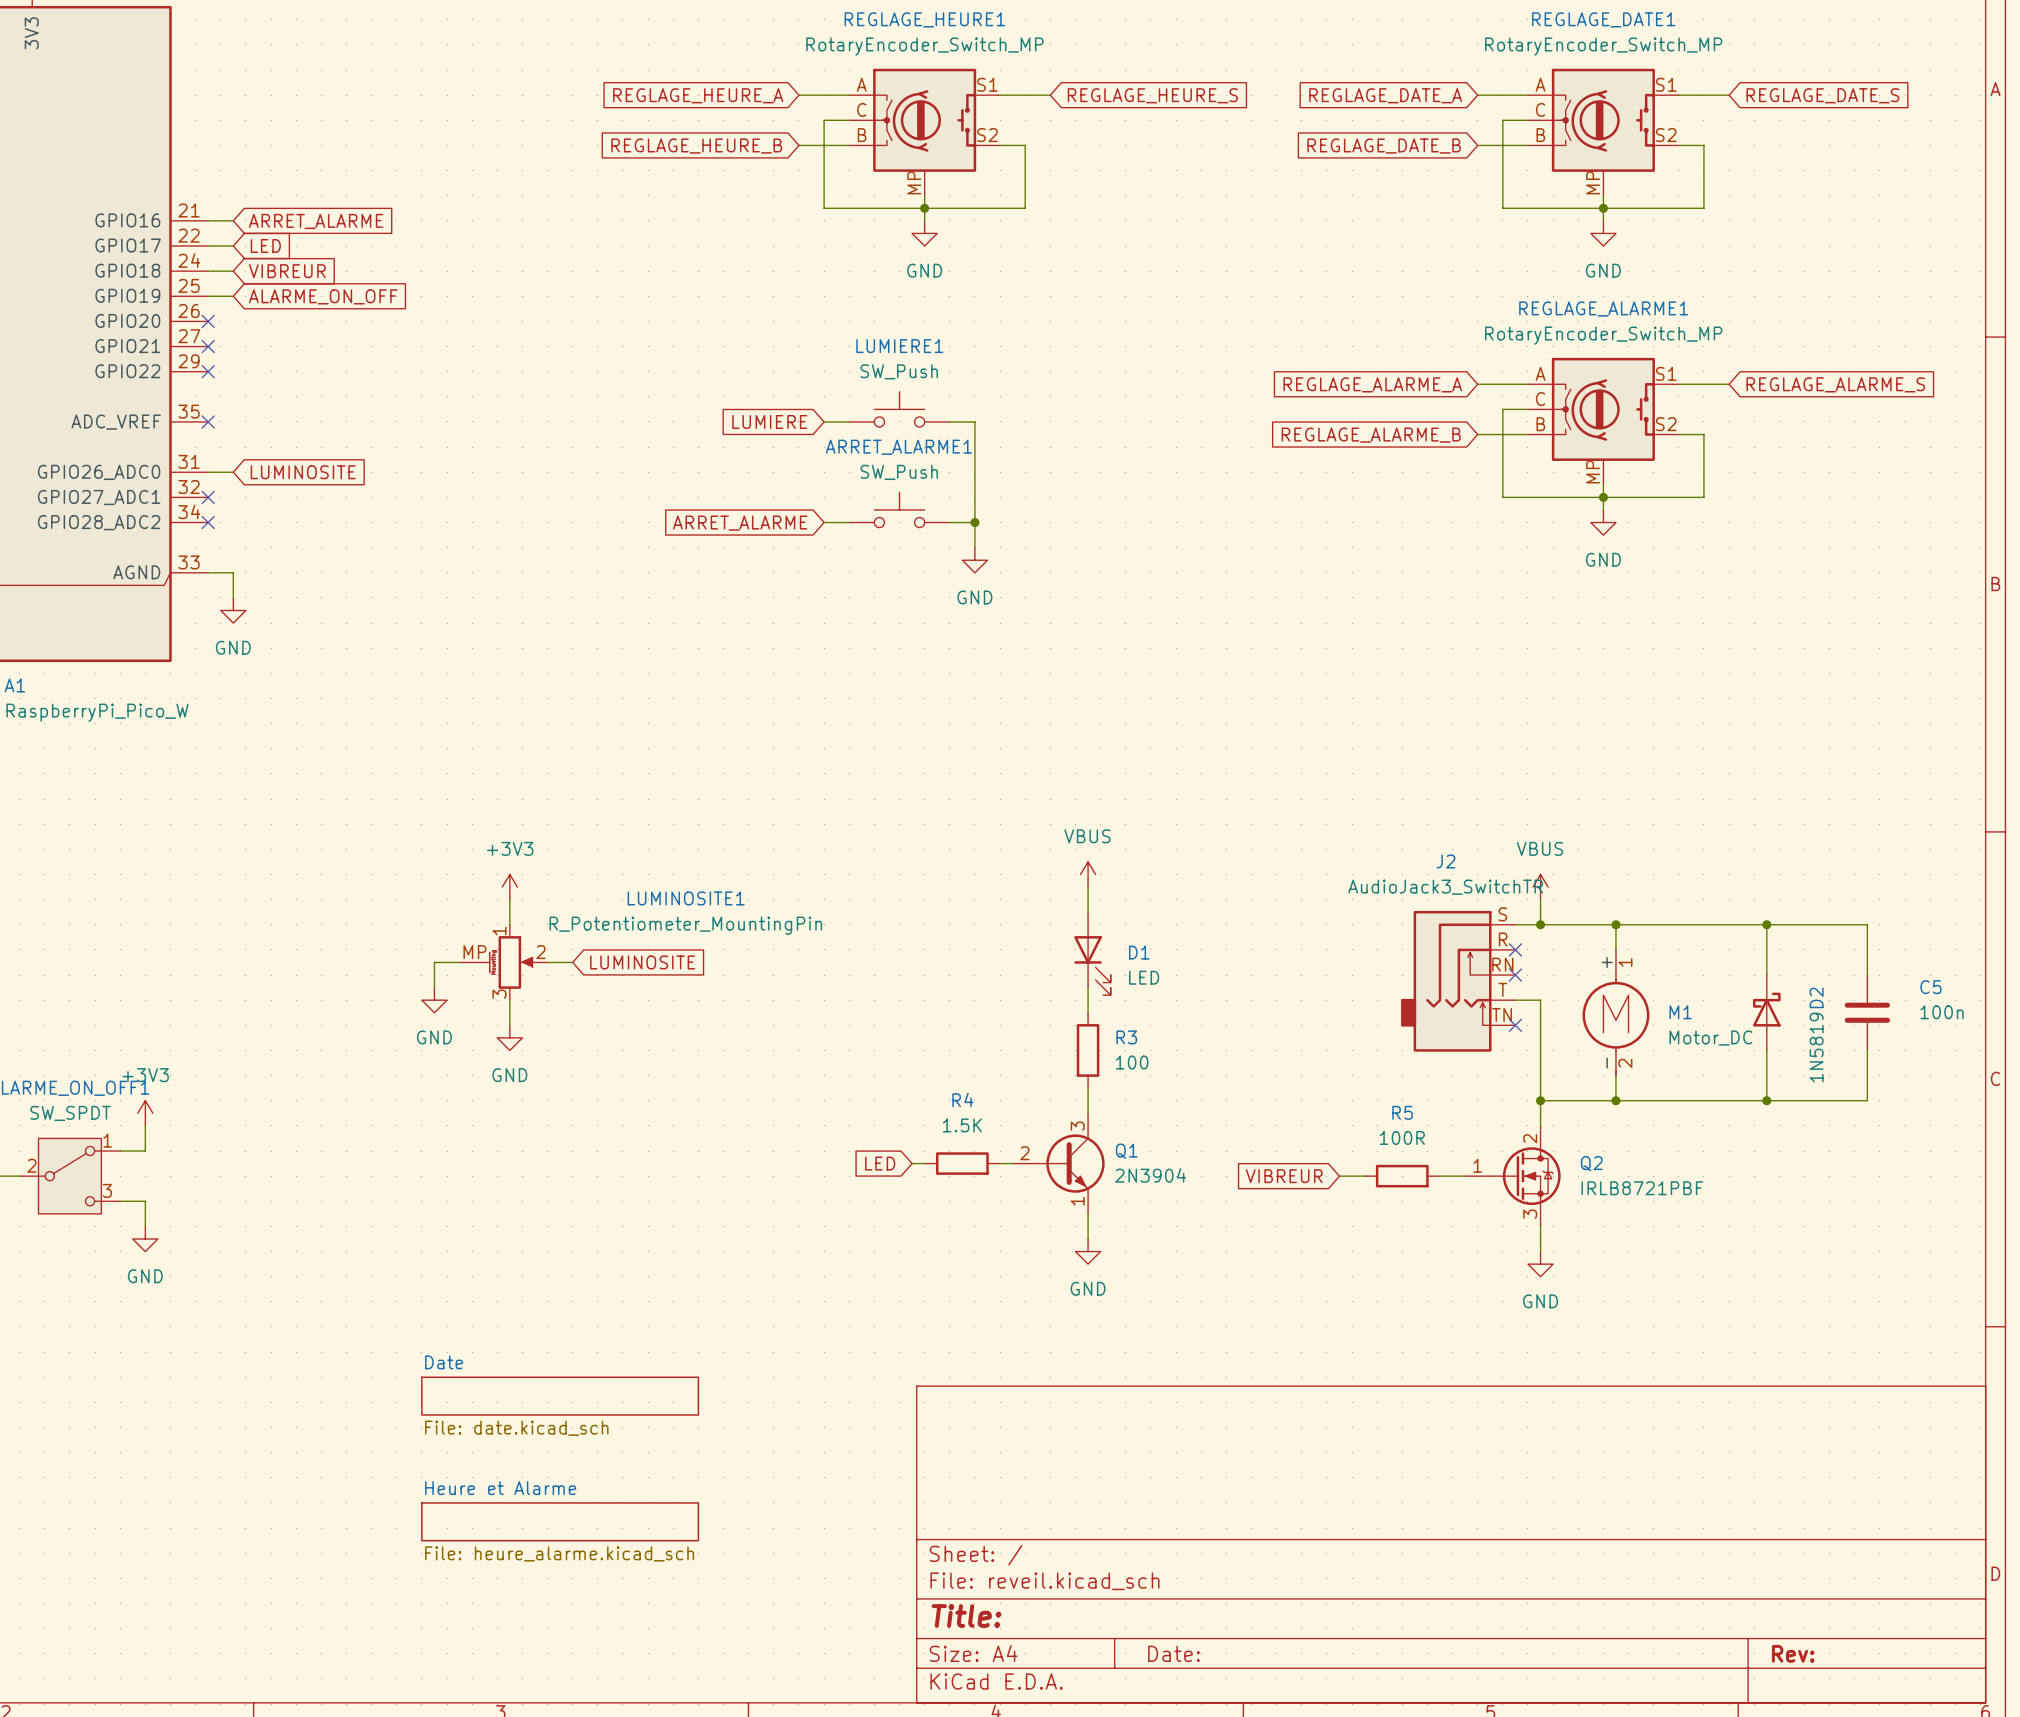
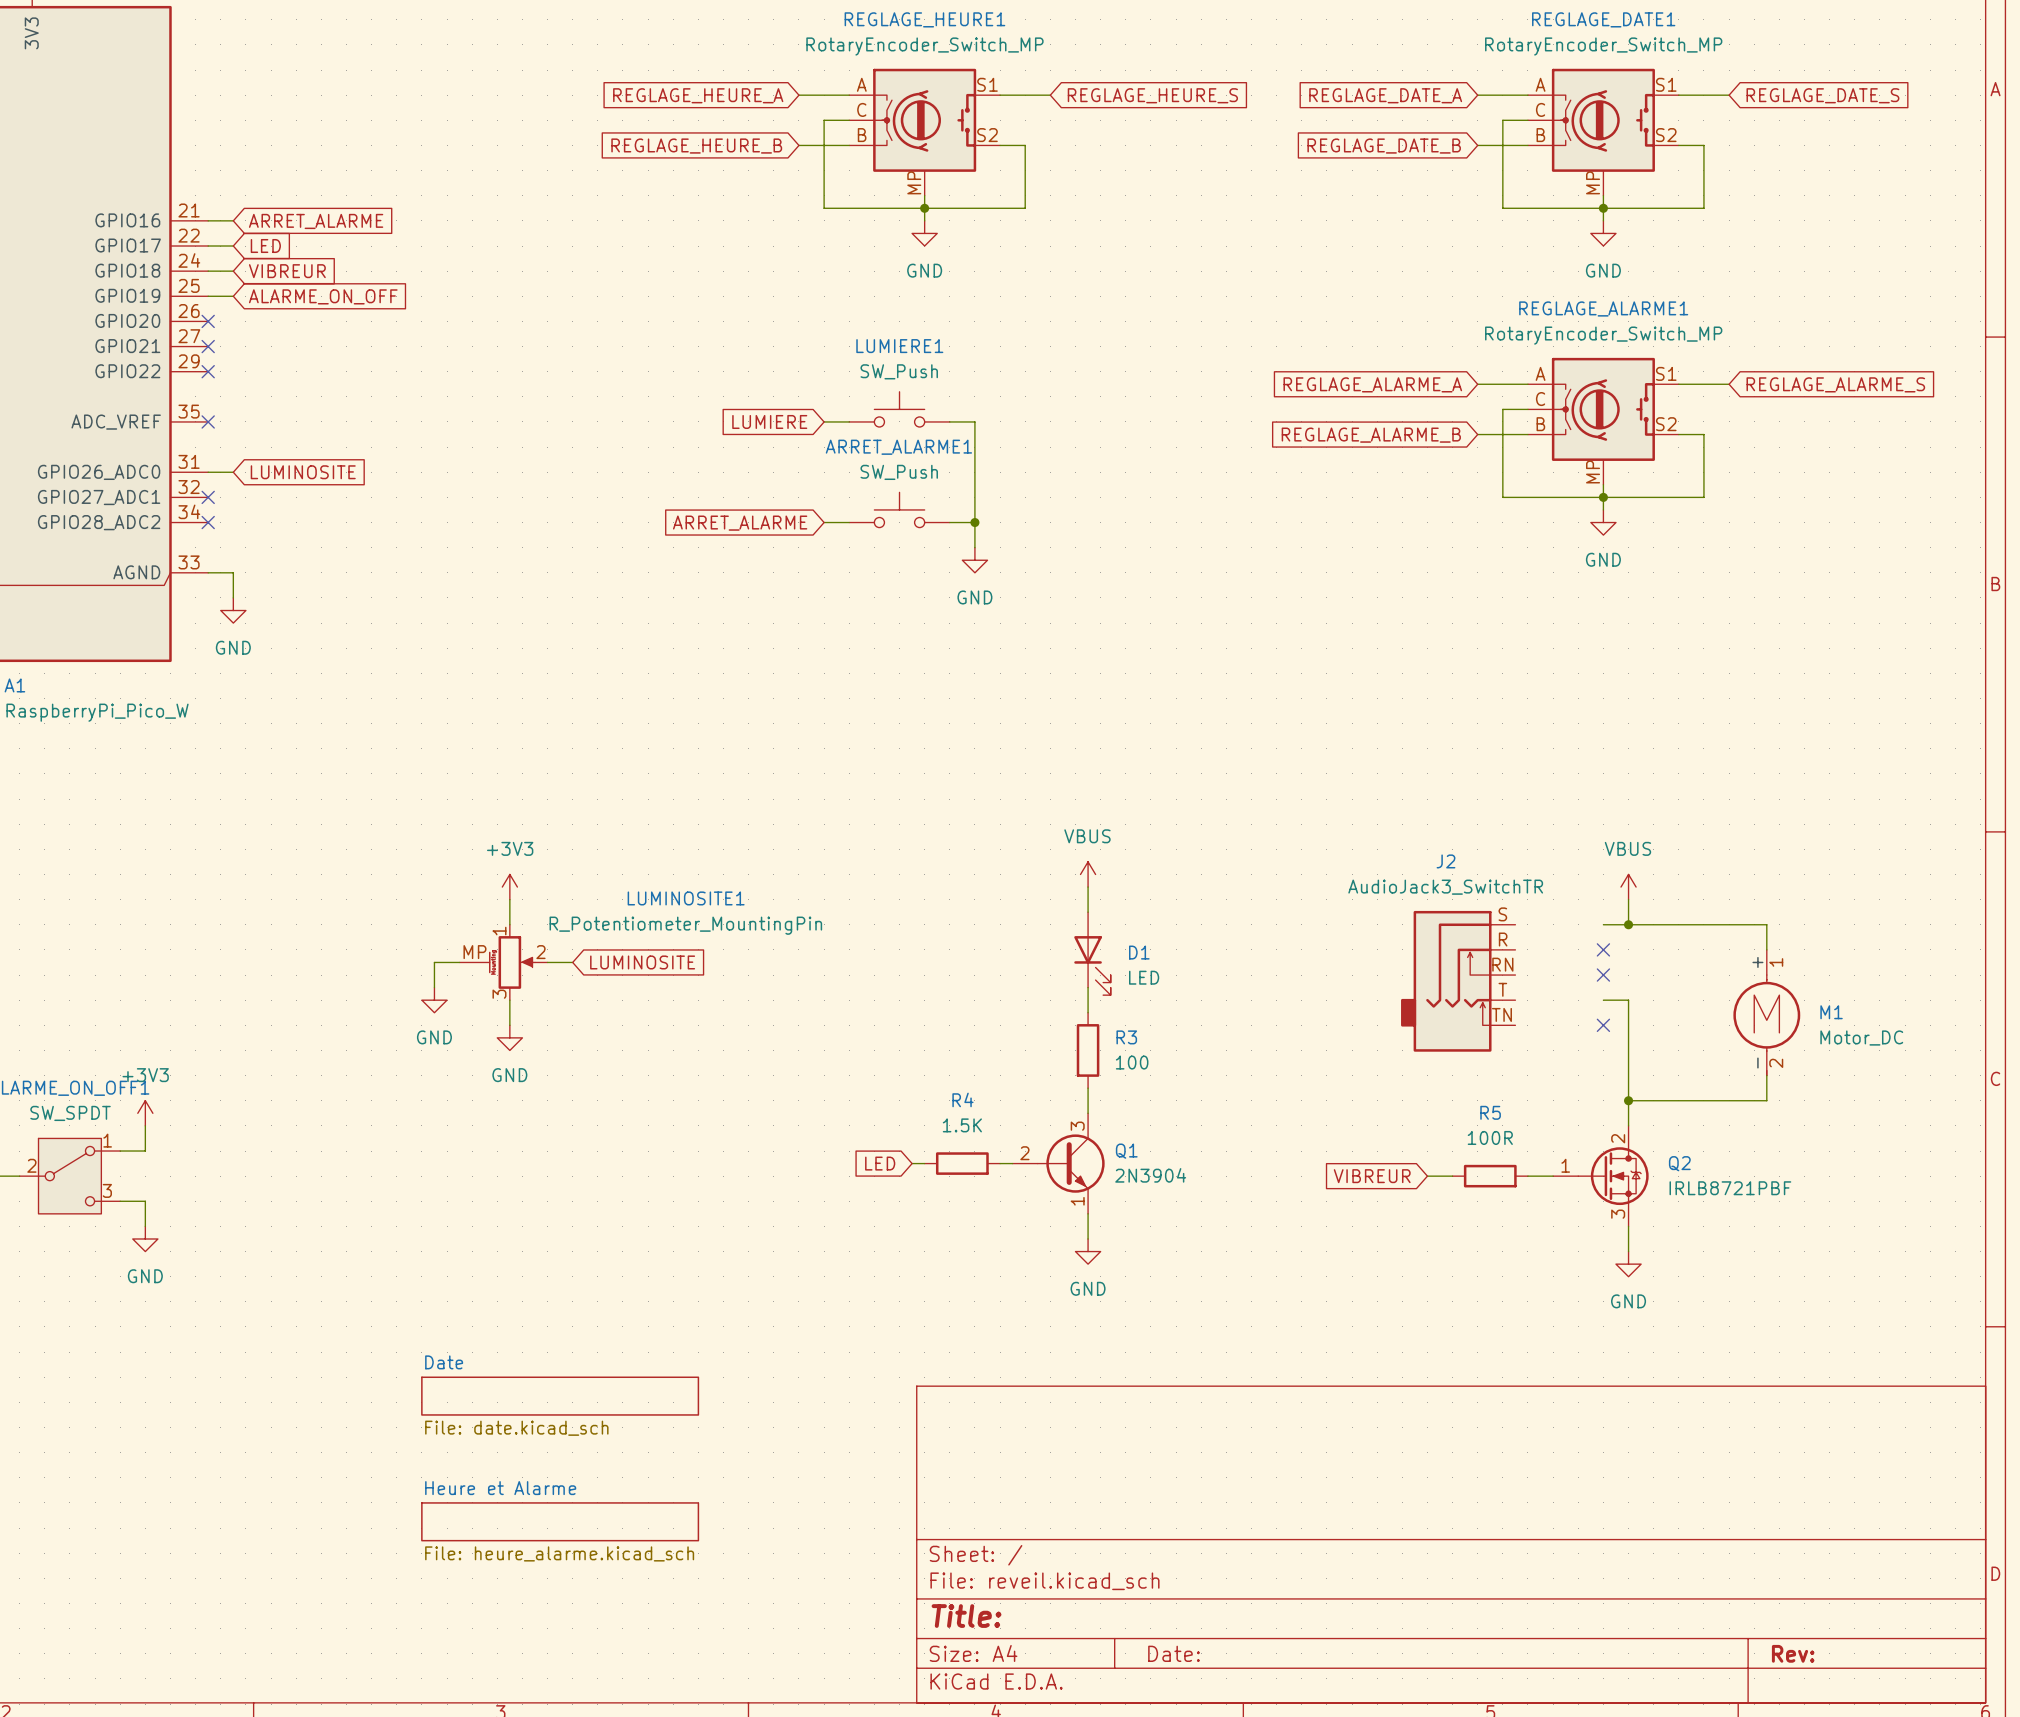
power symbol position: VBUS (1540, 887) -> VBUS (1628, 887)
wire: (1540, 899) (1540, 924) -> (1628, 899) (1628, 924)
wire: (1515, 924) (1603, 924) -> none
junction: (1540, 924) -> none
wire: (1615, 924) (1615, 949) -> none
junction position: (1615, 924) -> (1628, 924)
wire: (1766, 924) (1867, 924) (1867, 975) -> none
junction: (1766, 924) -> none
no-connect mark: (1515, 949) -> none
no-connect mark: none -> (1603, 949)
no-connect mark: (1515, 975) -> none
no-connect mark: none -> (1603, 975)
wire: (1515, 1000) (1540, 1000) (1540, 1125) -> (1603, 1000) (1628, 1000) (1628, 1125)
M1 position: (1615, 1012) -> (1766, 1012)
D2: 1N5819 (1766, 1012) -> none
C5: 100n (1867, 1012) -> none
no-connect mark: (1515, 1025) -> none
no-connect mark: none -> (1603, 1025)
wire: (1867, 1050) (1867, 1100) (1766, 1100) -> none
wire: (1615, 1075) (1615, 1100) -> none
wire: (1540, 1100) (1628, 1100) -> none
junction: (1540, 1100) -> none
junction position: (1615, 1100) -> (1628, 1100)
junction: (1766, 1100) -> none
global label position: VIBREUR (1284, 1176) -> VIBREUR (1372, 1176)
R5 position: (1402, 1176) -> (1490, 1176)
Q2 position: (1512, 1176) -> (1600, 1176)
wire: (1540, 1226) (1540, 1251) -> (1628, 1226) (1628, 1251)
power symbol position: GND (1540, 1264) -> GND (1628, 1264)

